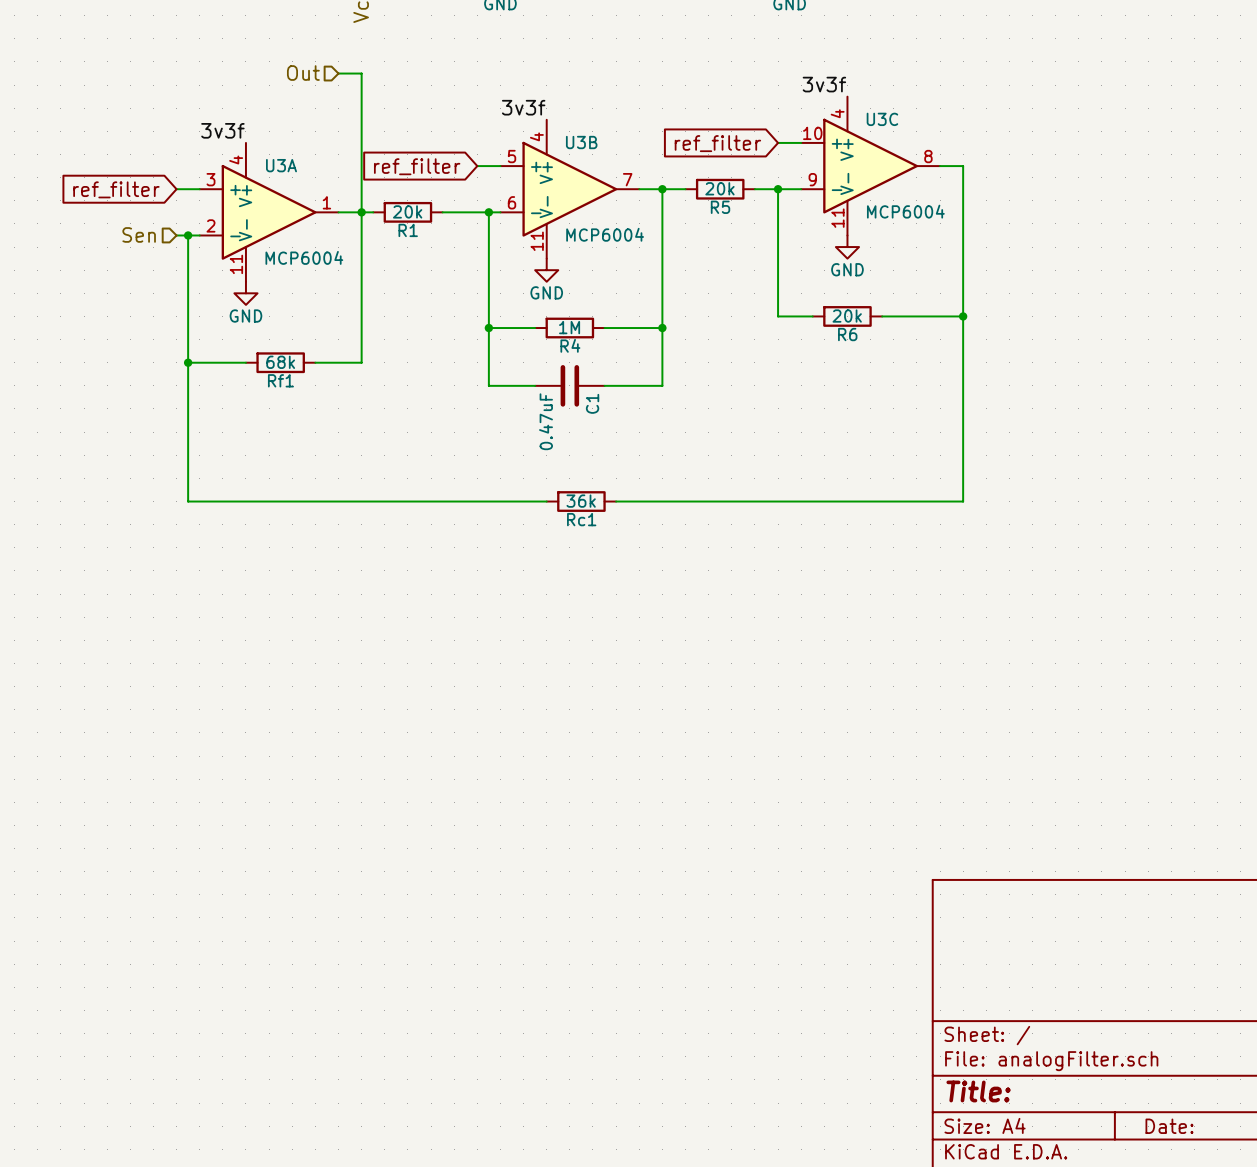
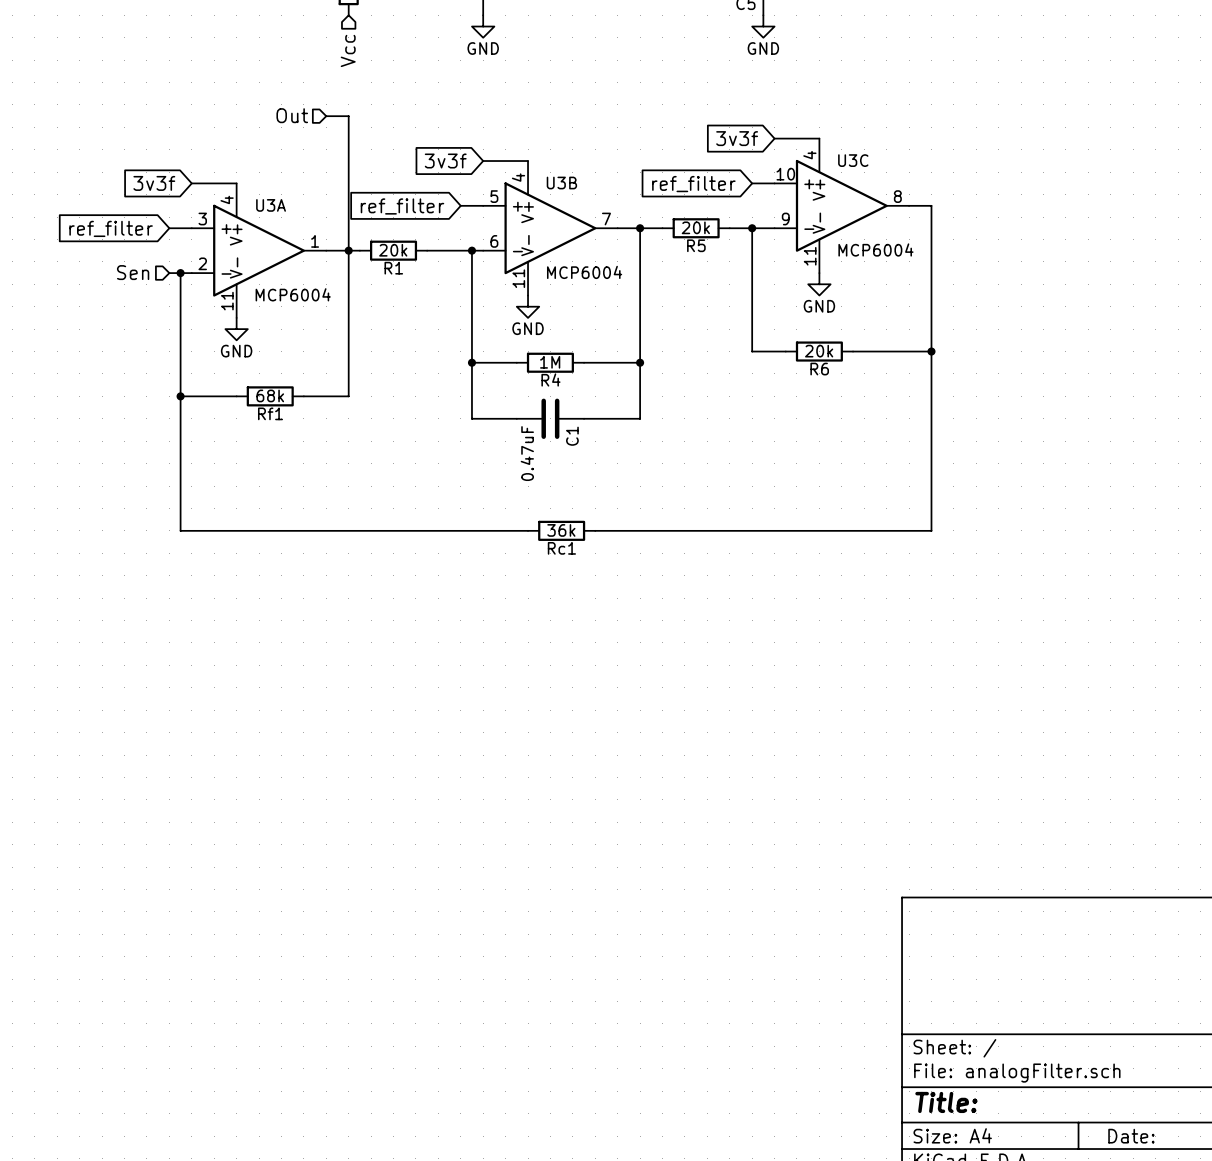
label: 3v3f (824, 84) -> none
global label: none -> 3v3f (737, 138)
wire: none -> (774, 138) (819, 138)
label: 3v3f (523, 107) -> none
global label: none -> 3v3f (445, 161)
wire: none -> (483, 161) (528, 161)
label: 3v3f (222, 130) -> none
global label: none -> 3v3f (154, 183)
wire: none -> (191, 183) (236, 183)

